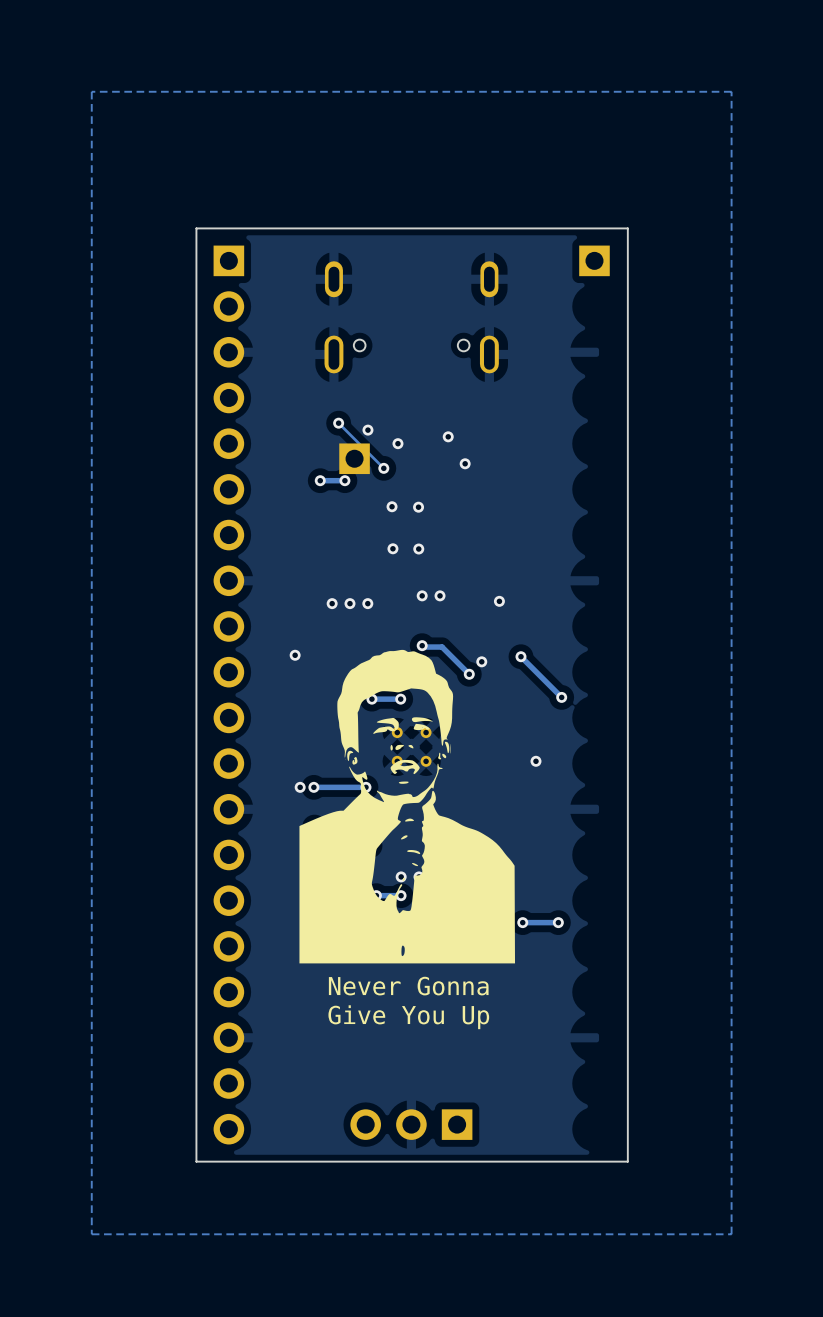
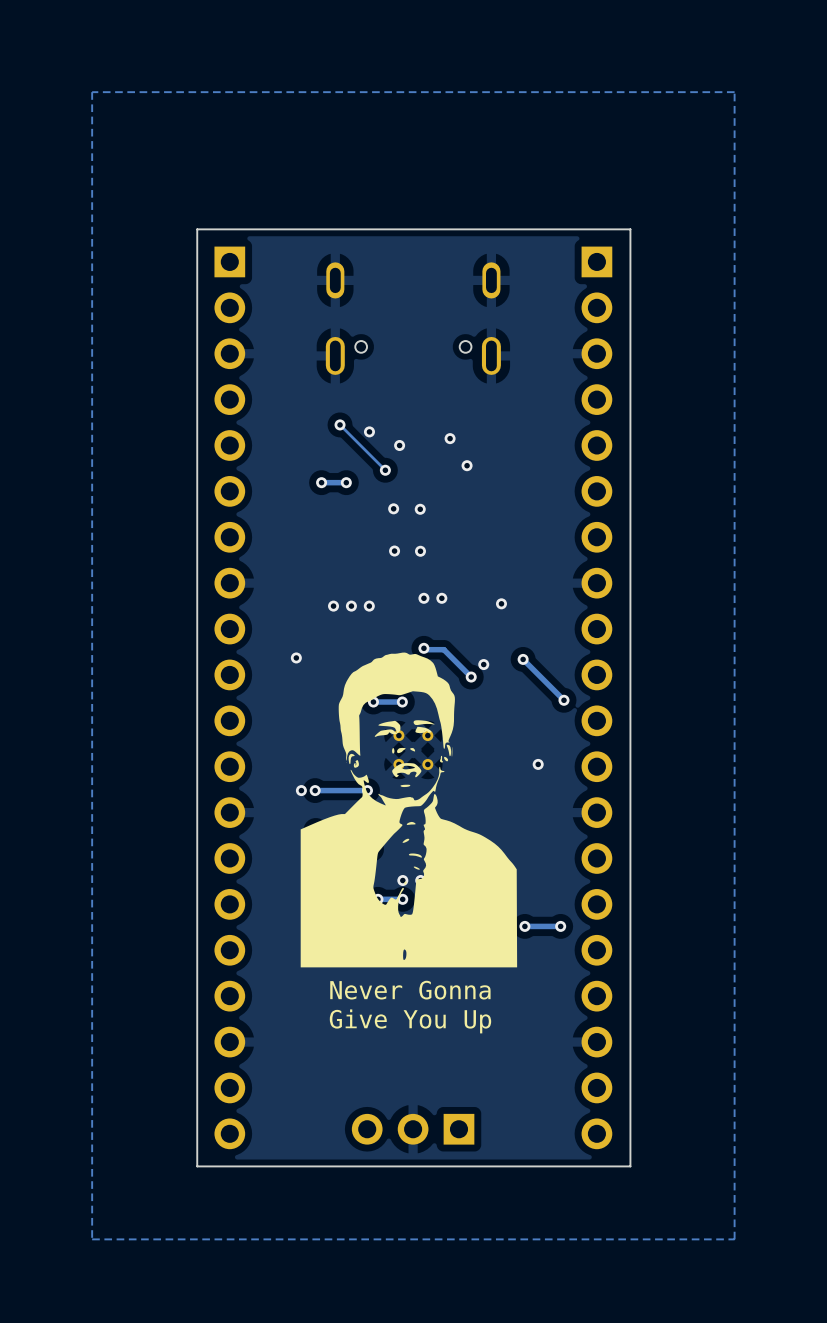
part: (354, 458) -> none
part: none -> (596, 697)

